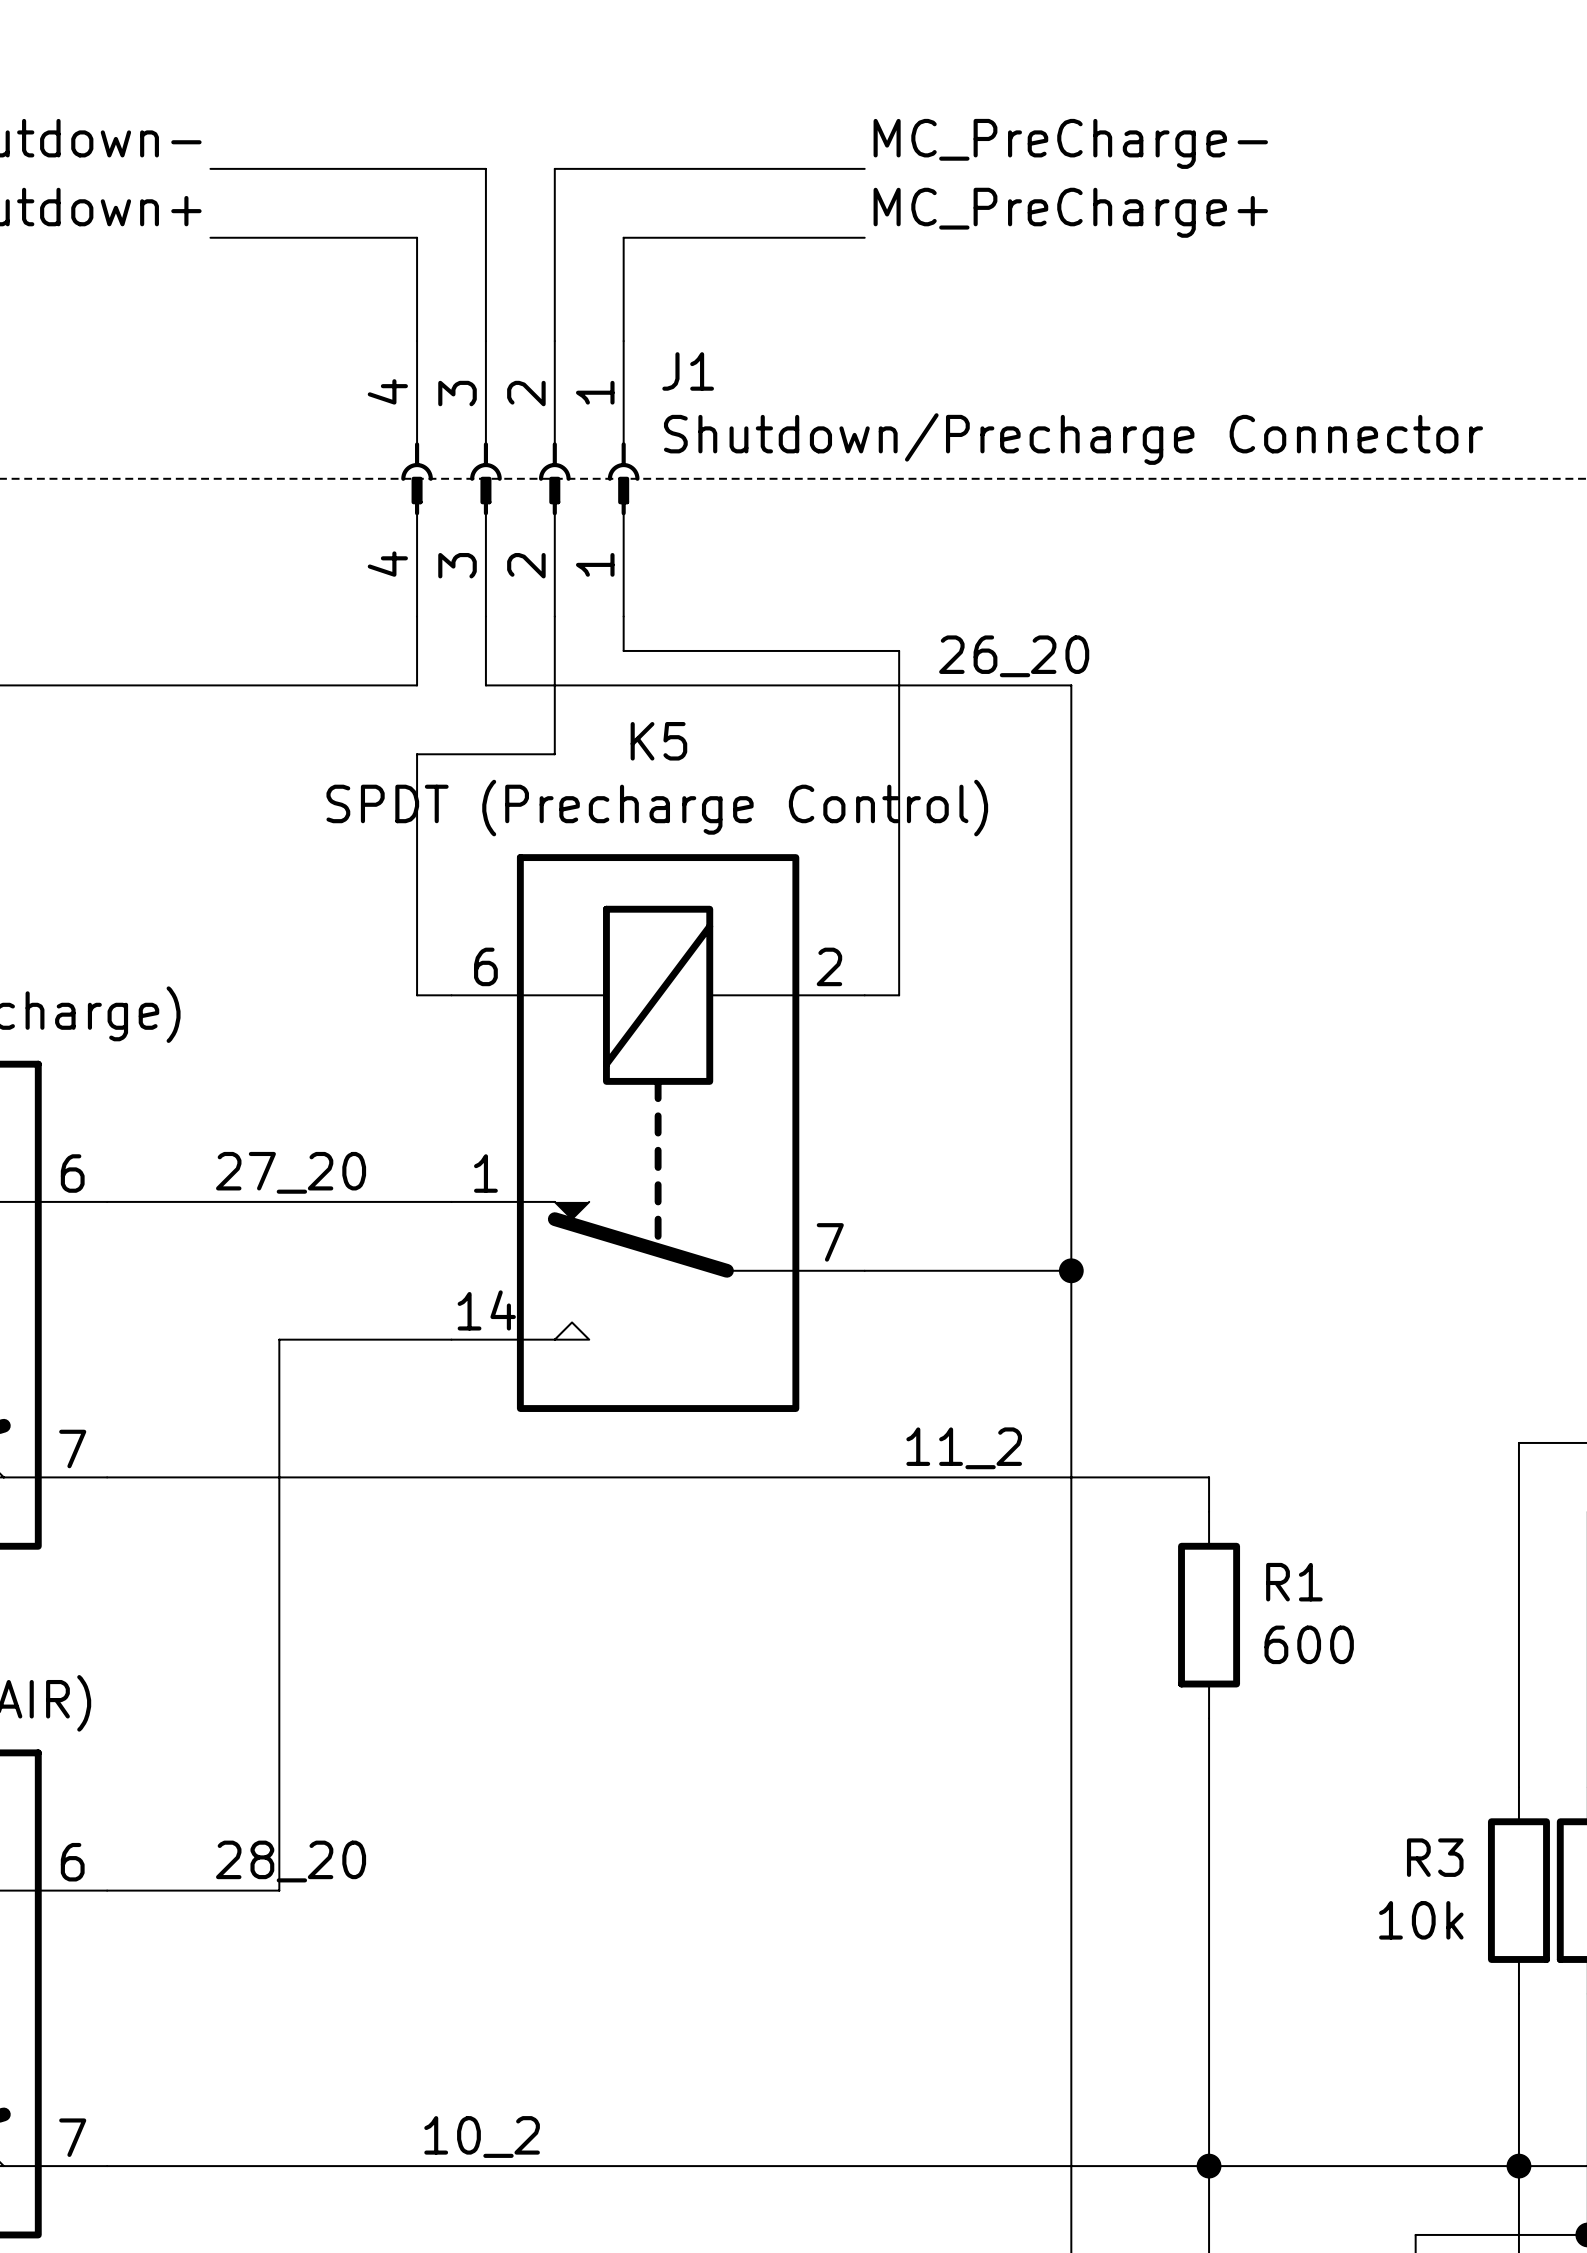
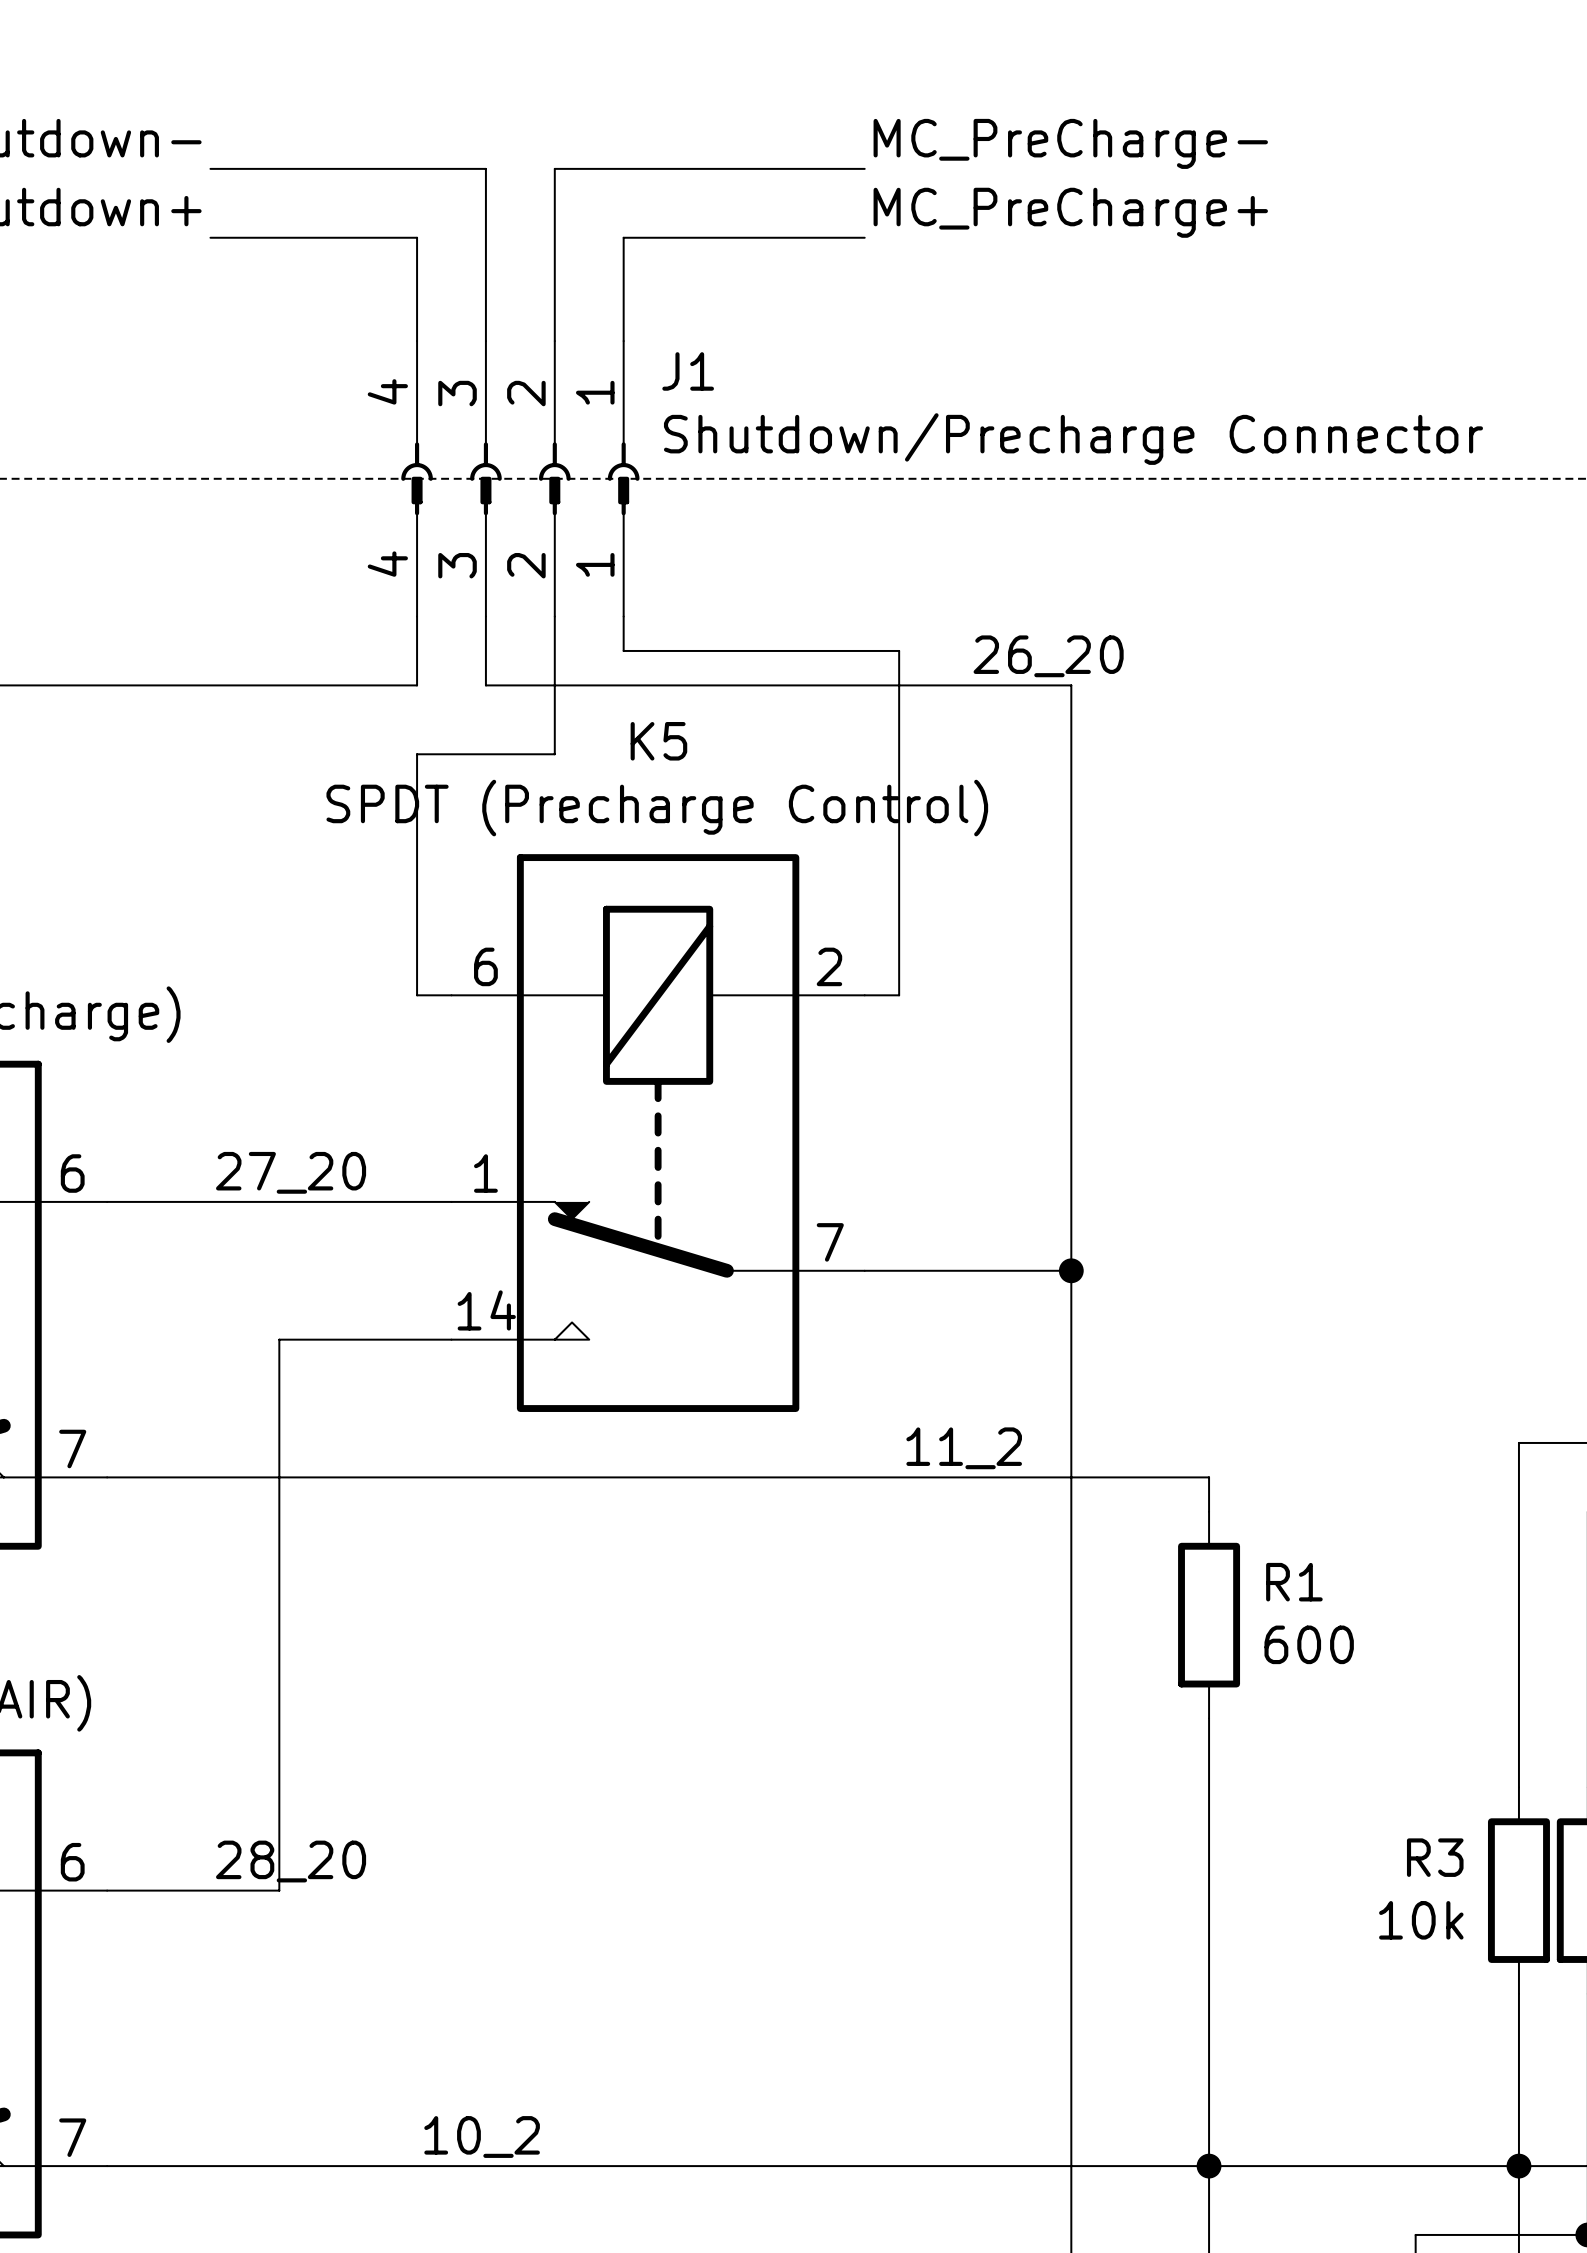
label position: 26_20 (1014, 656) -> 26_20 (1048, 656)

